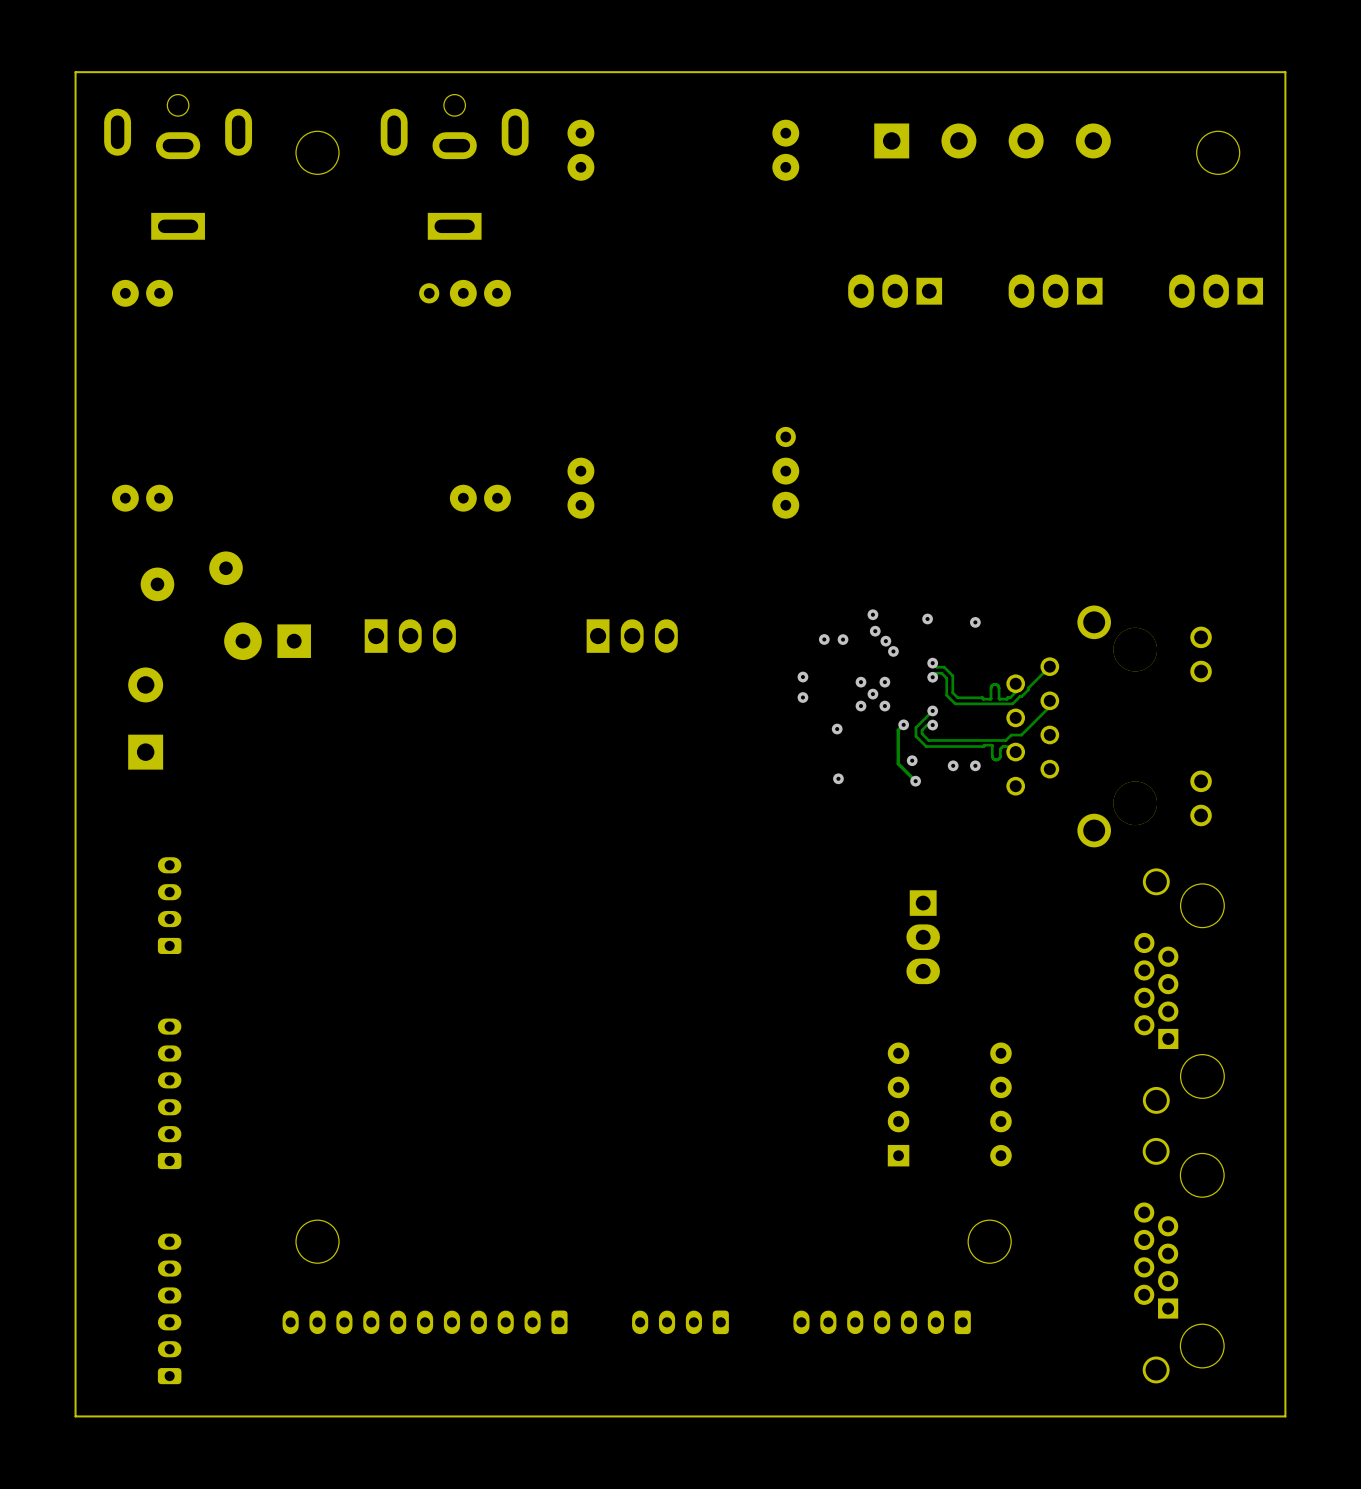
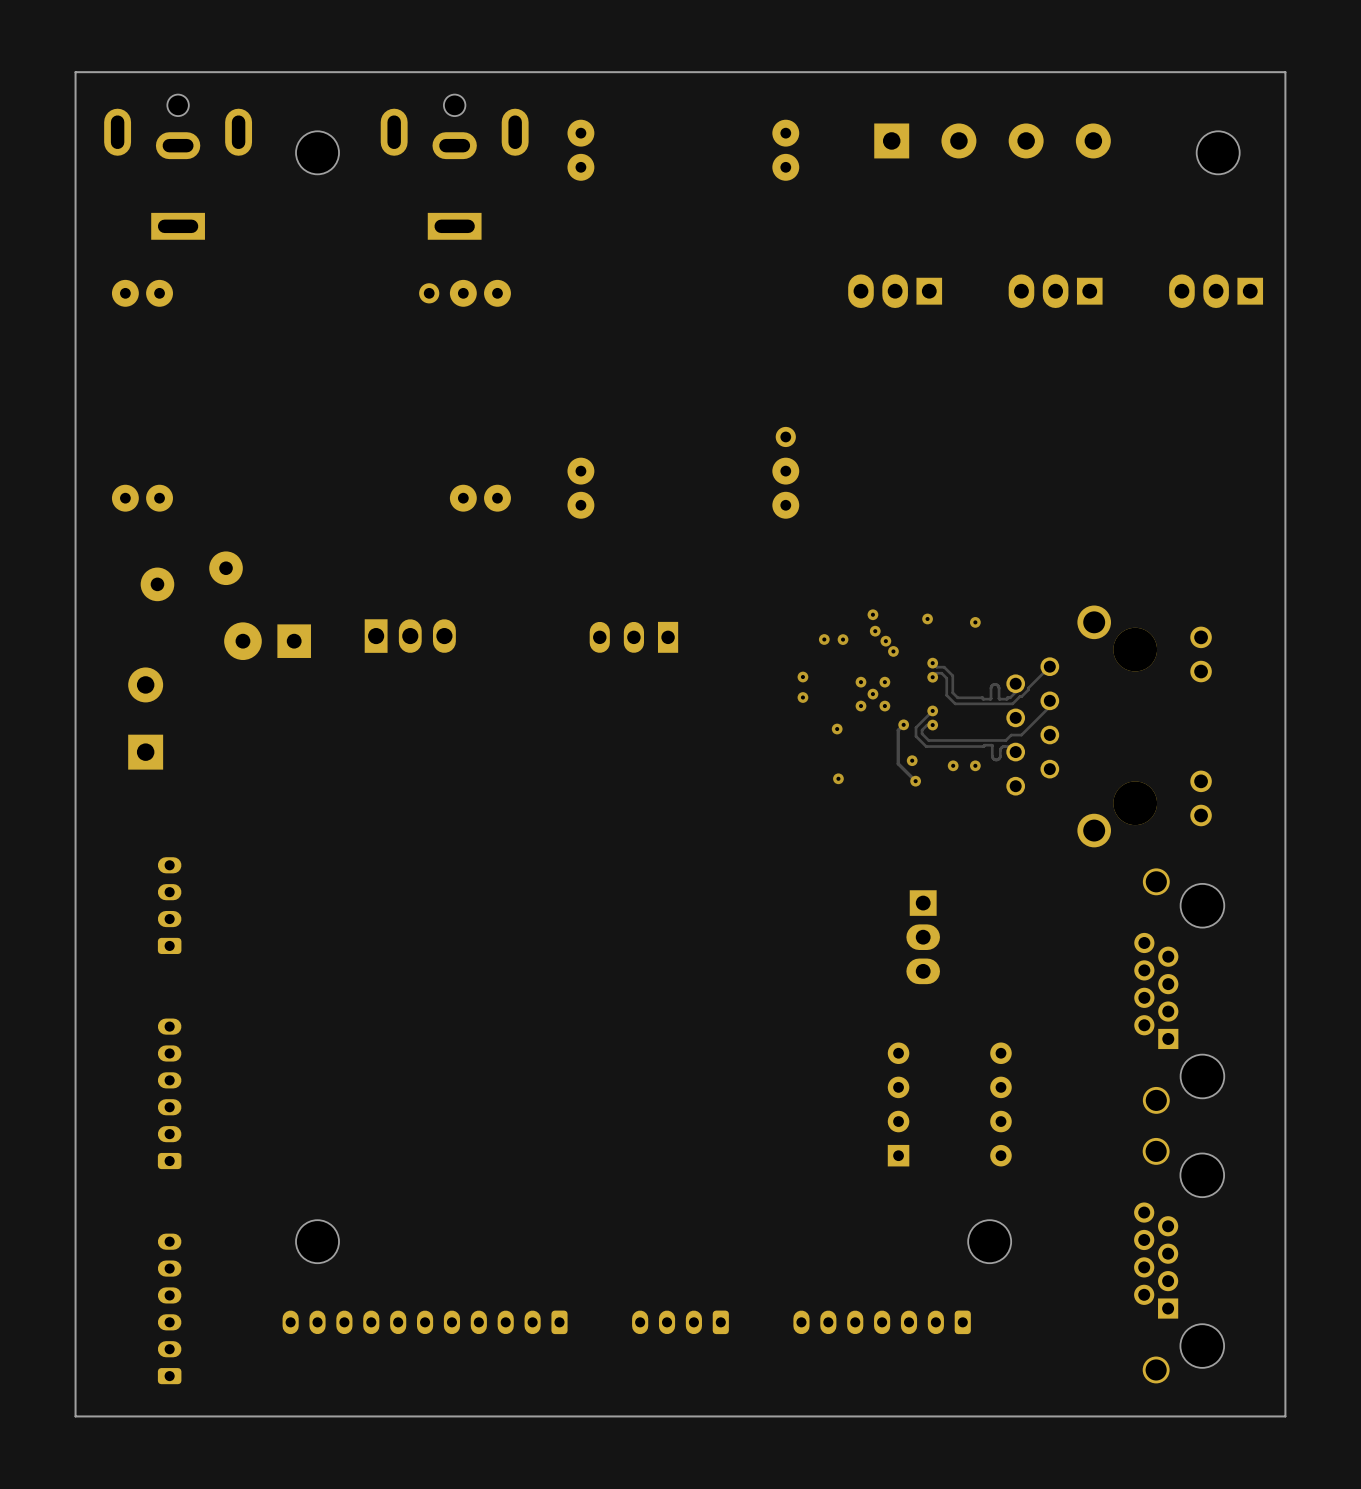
part footprint: [586, 619, 678, 653] -> [589, 621, 679, 653]

